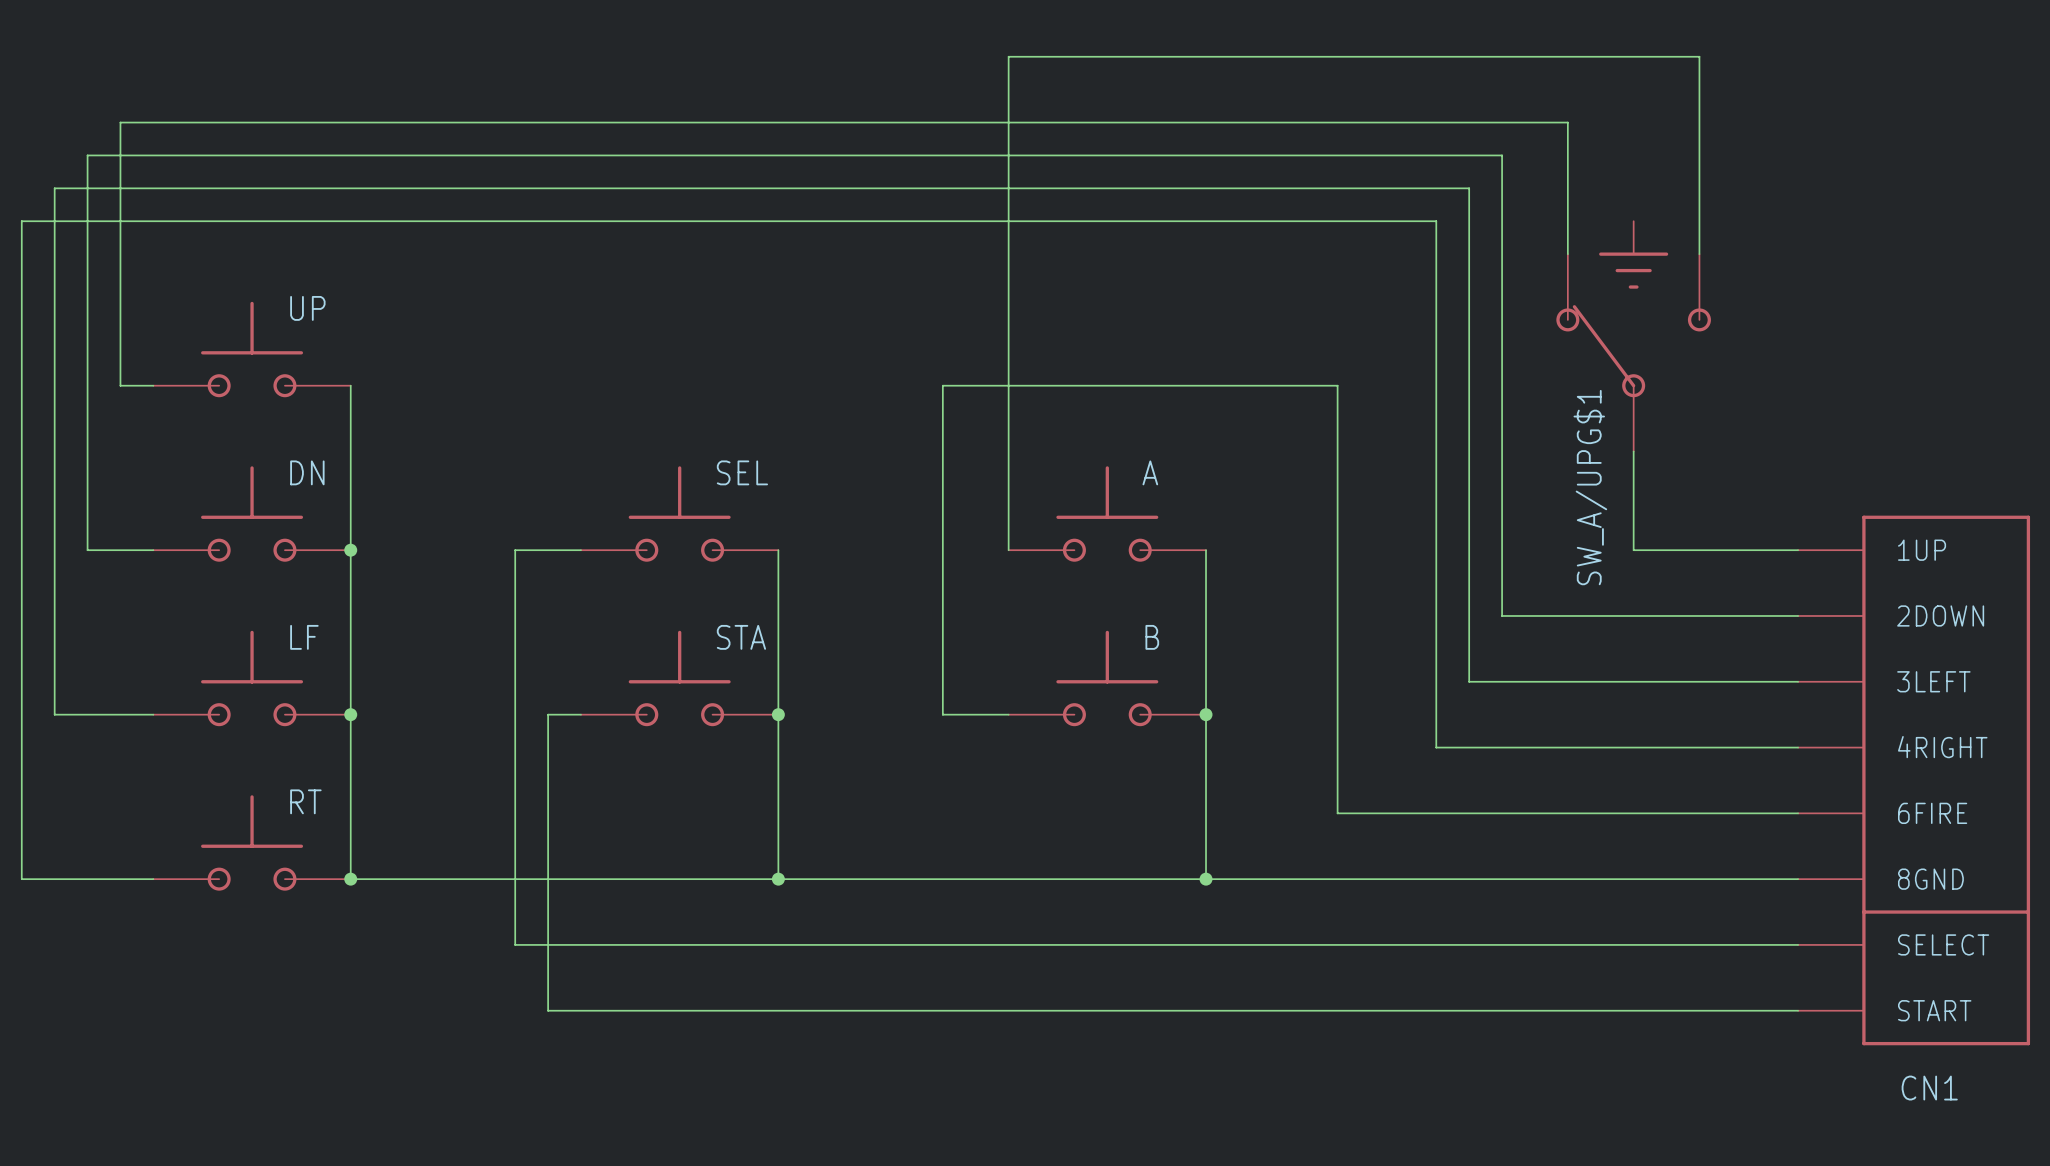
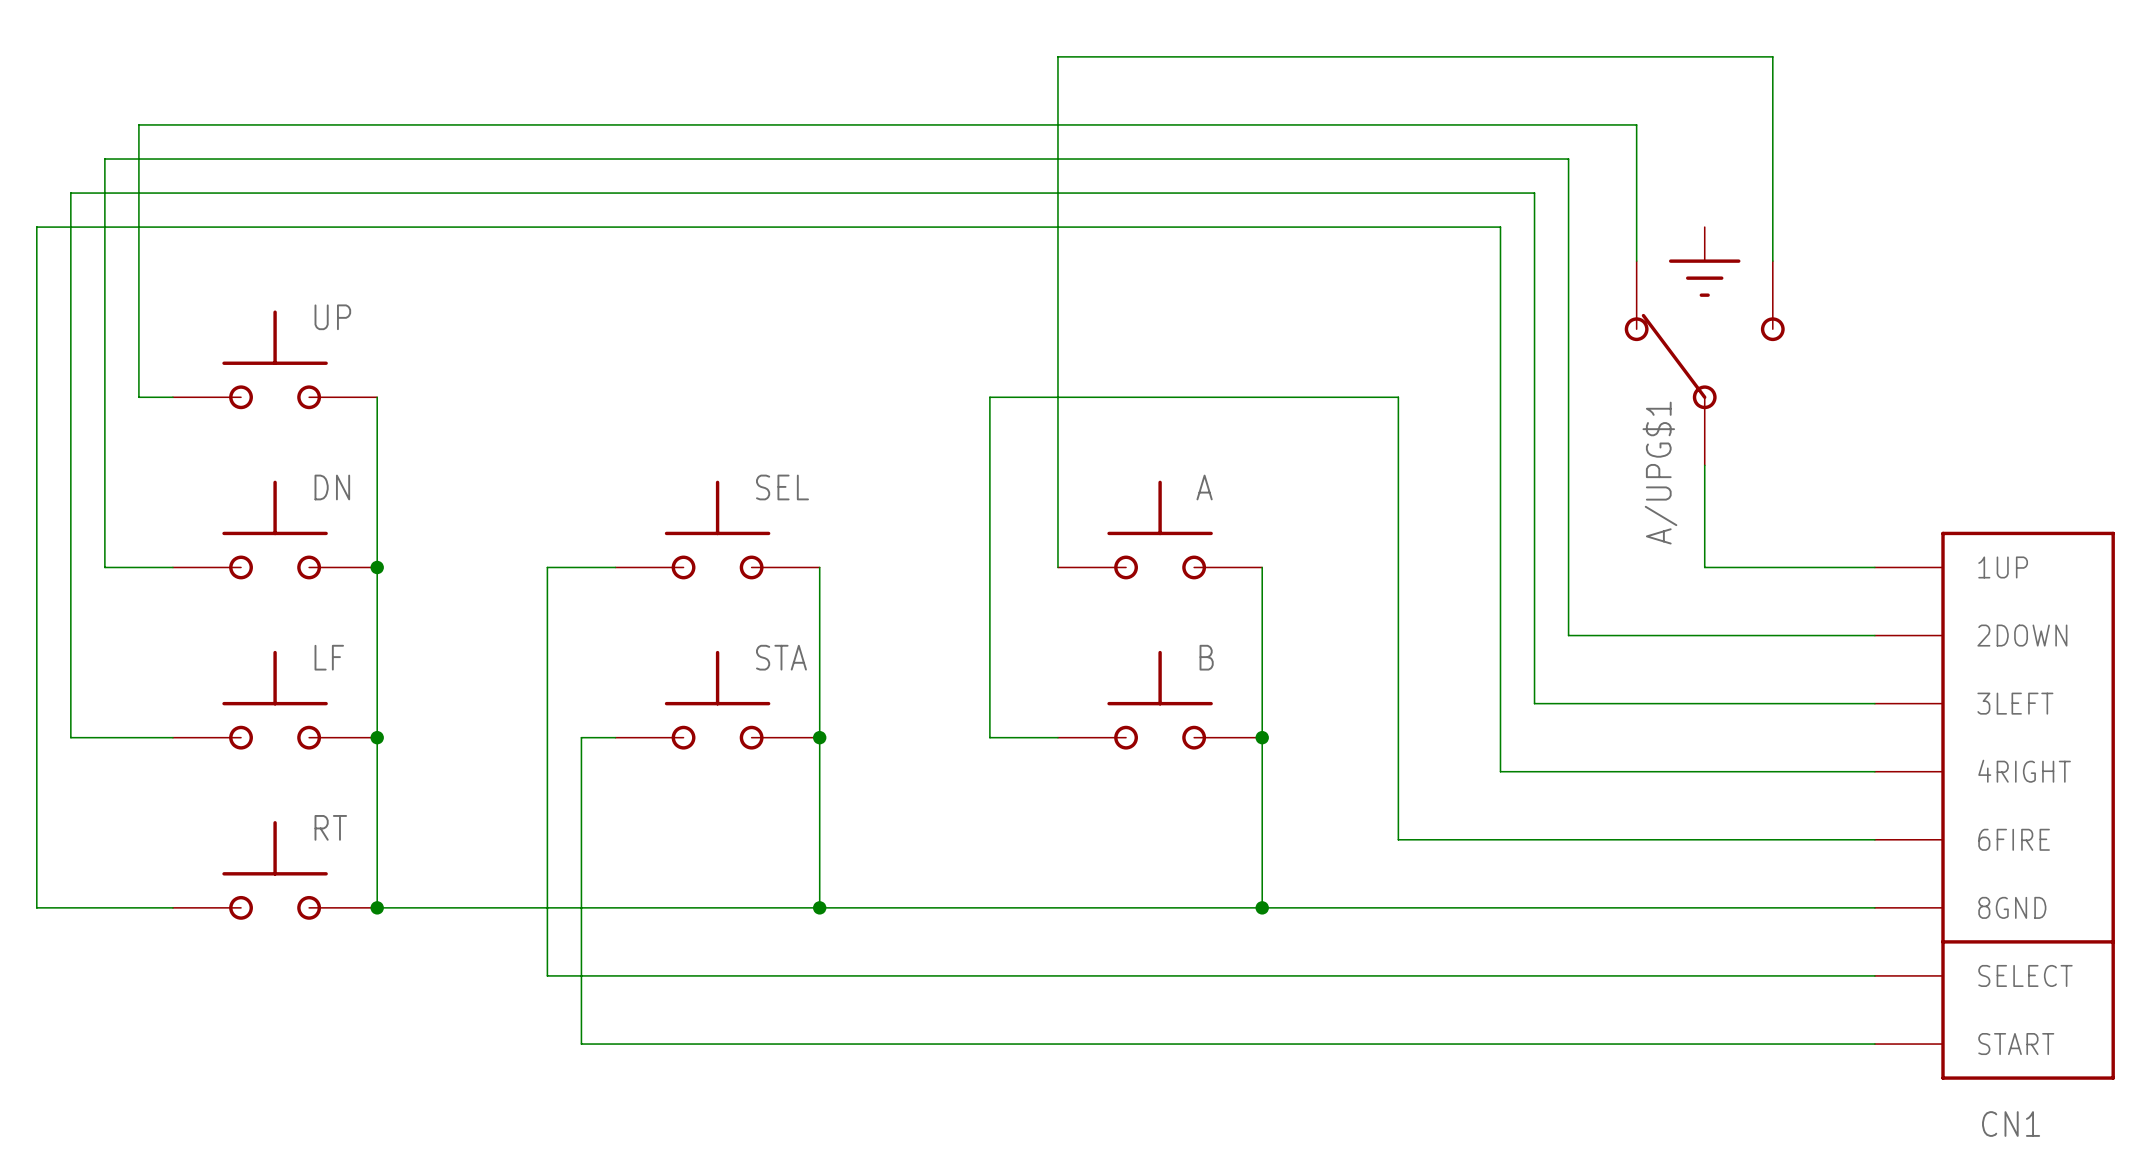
SW_A/UPG$1 name: SW_A/UPG$1 (1590, 487) -> A/UPG$1 (1659, 473)

